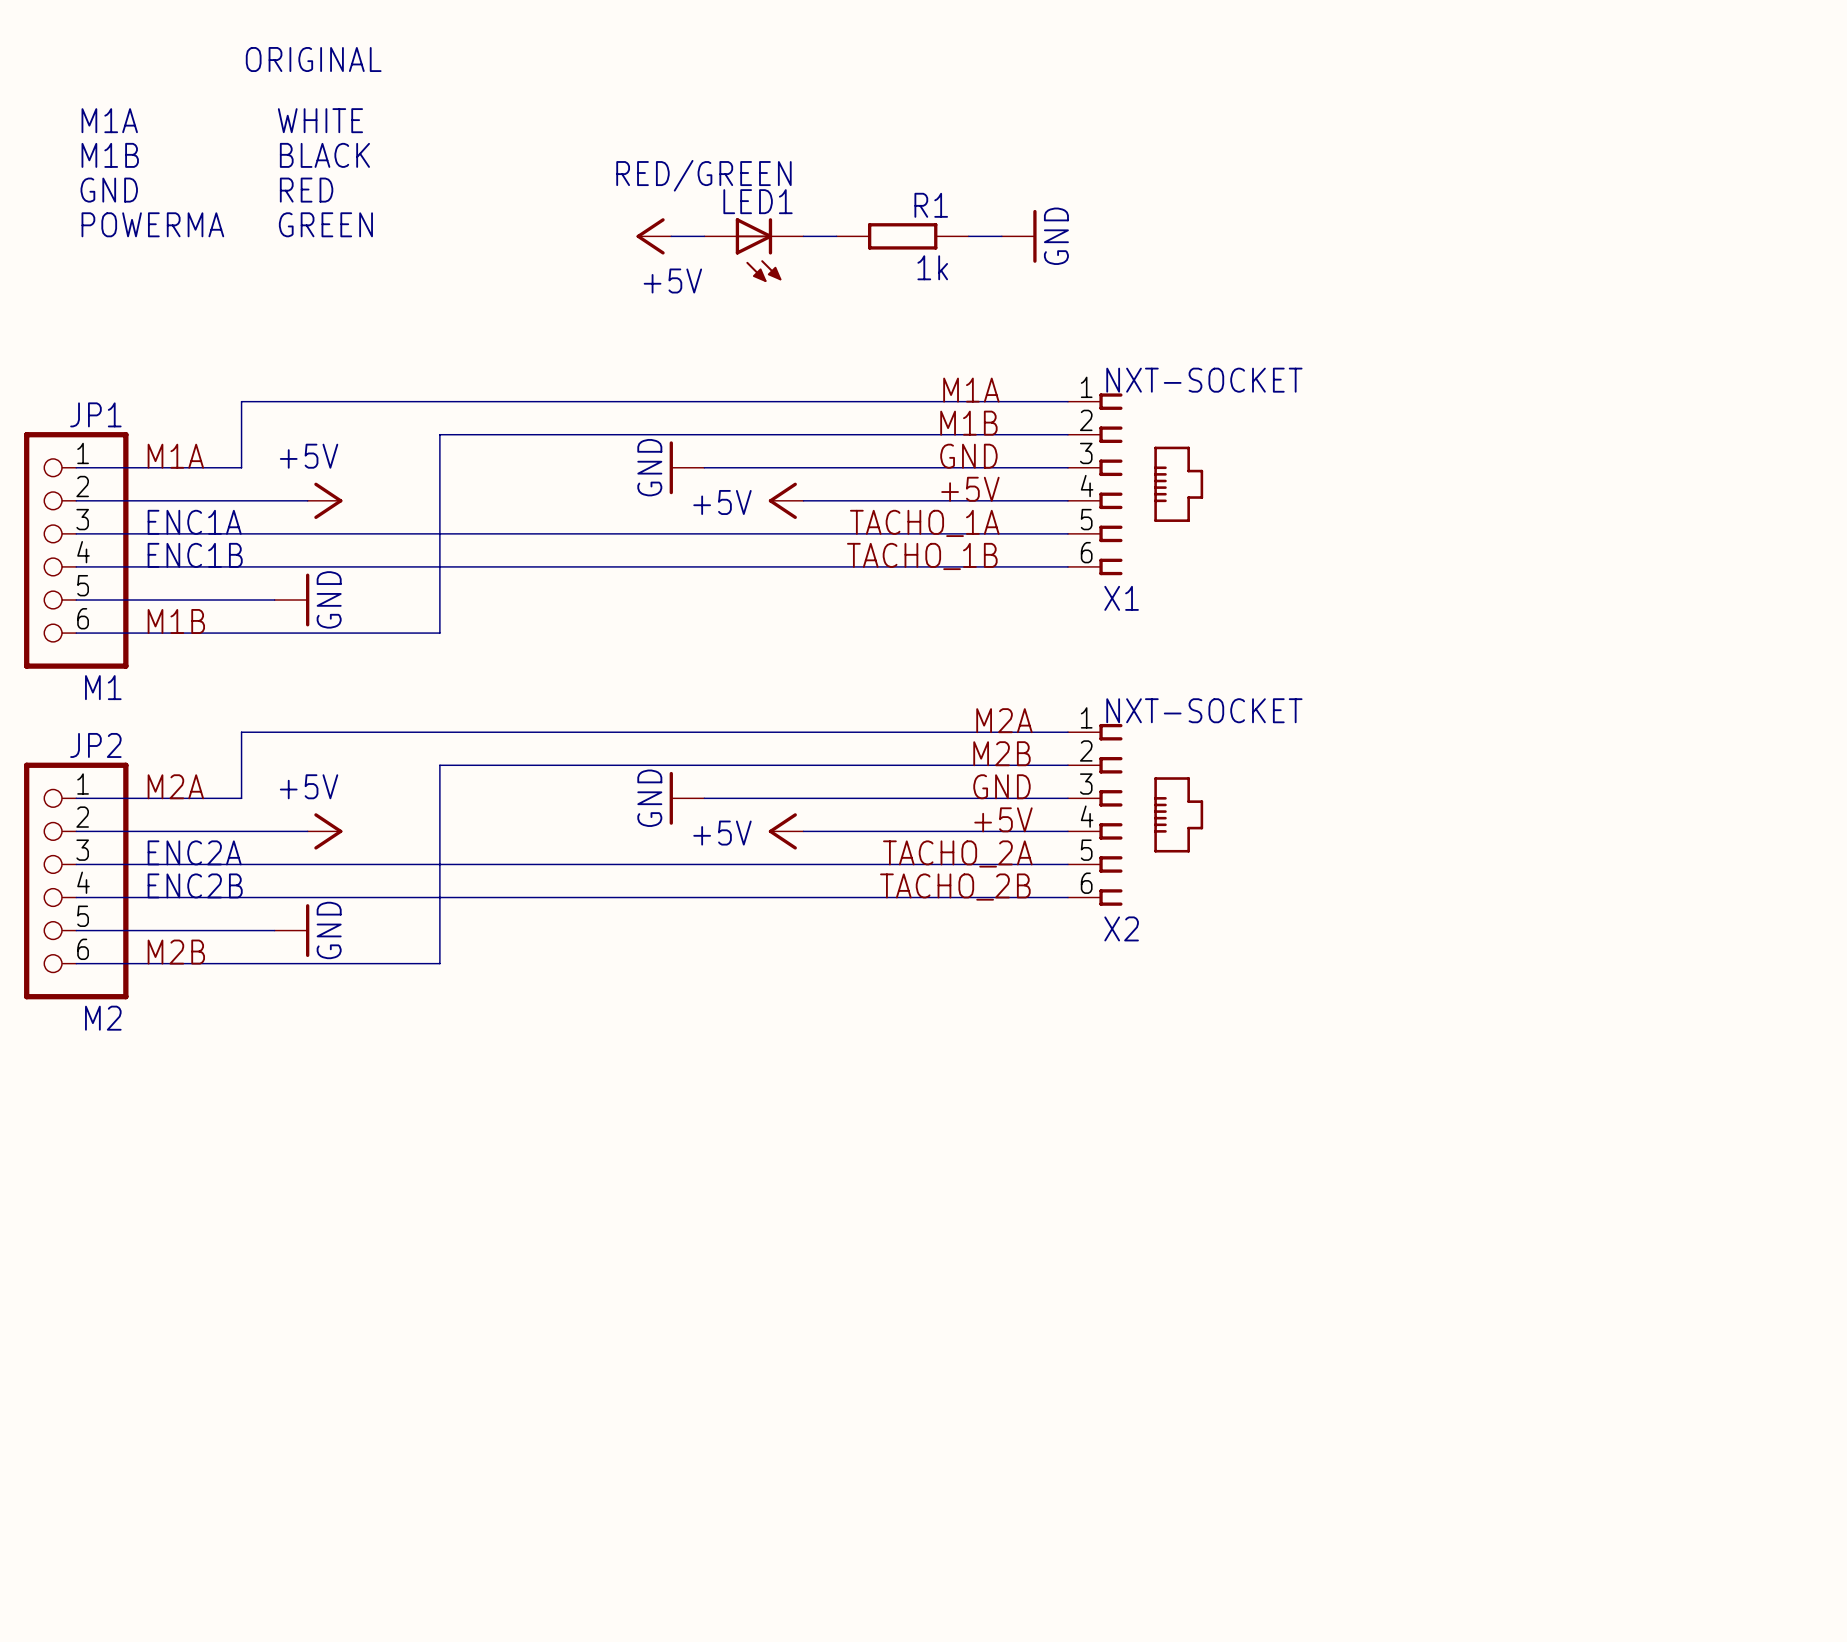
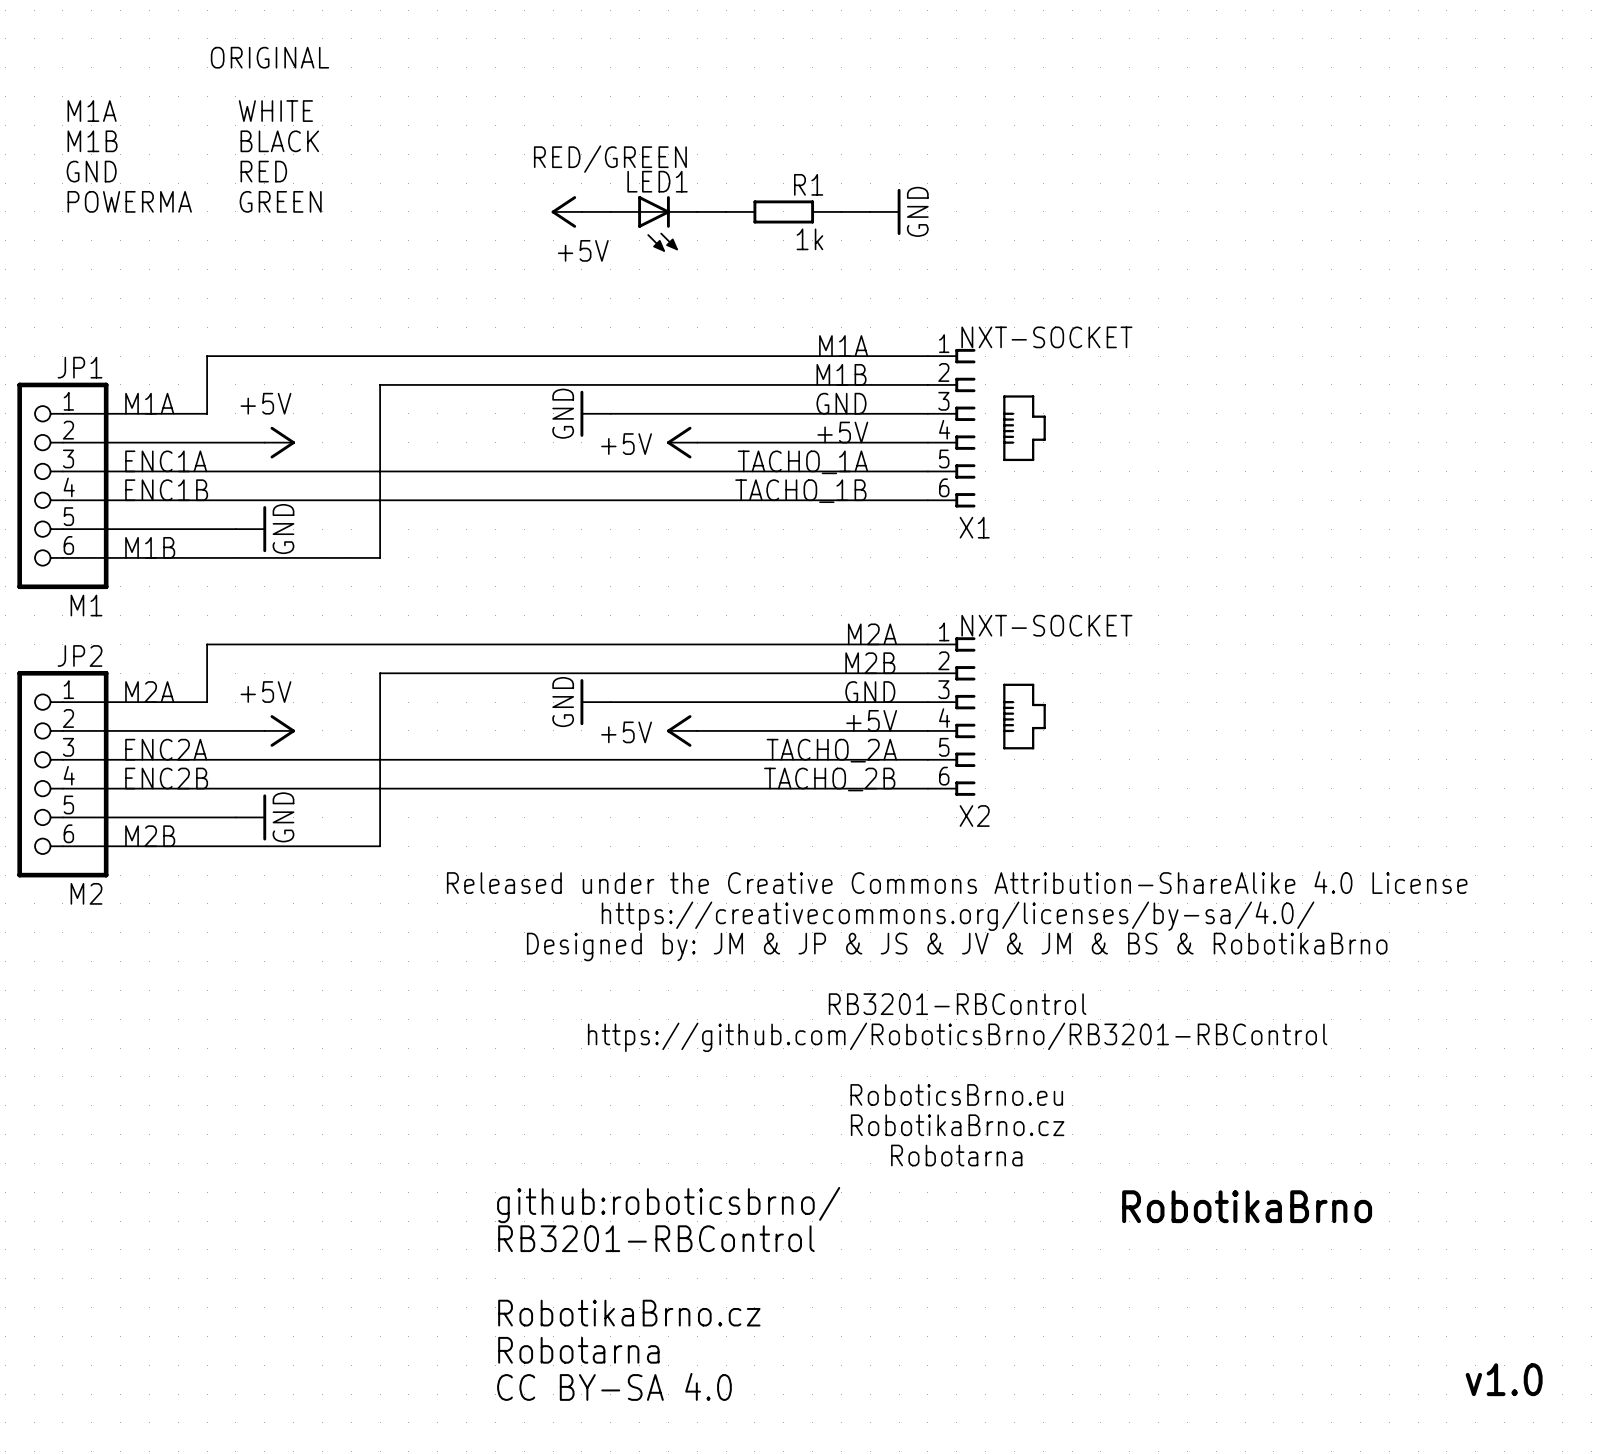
text: none -> Released under the Creative Commons Attribution-ShareAlike 4.0 License (957, 882)
text: none -> https://creativecommons.org/licenses/by-sa/4.0/ (958, 916)
text: none -> Designed by: JM & JP & JS & JV & JM & BS & RobotikaBrno (957, 946)
text: none -> RB3201-RBControl (957, 1004)
text: none -> https://github.com/RoboticsBrno/RB3201-RBControl (957, 1037)
text: none -> RoboticsBrno.eu (956, 1094)
text: none -> RobotikaBrno.cz (957, 1125)
text: none -> Robotarna (956, 1155)
text: none -> github:roboticsbrno/ (668, 1205)
text: none -> RobotikaBrno (1247, 1206)
text: none -> RB3201-RBControl (656, 1238)
text: none -> RobotikaBrno.cz (629, 1313)
text: none -> Robotarna (578, 1350)
text: none -> v1.0 (1504, 1379)
text: none -> CC BY-SA 4.0 (614, 1386)

